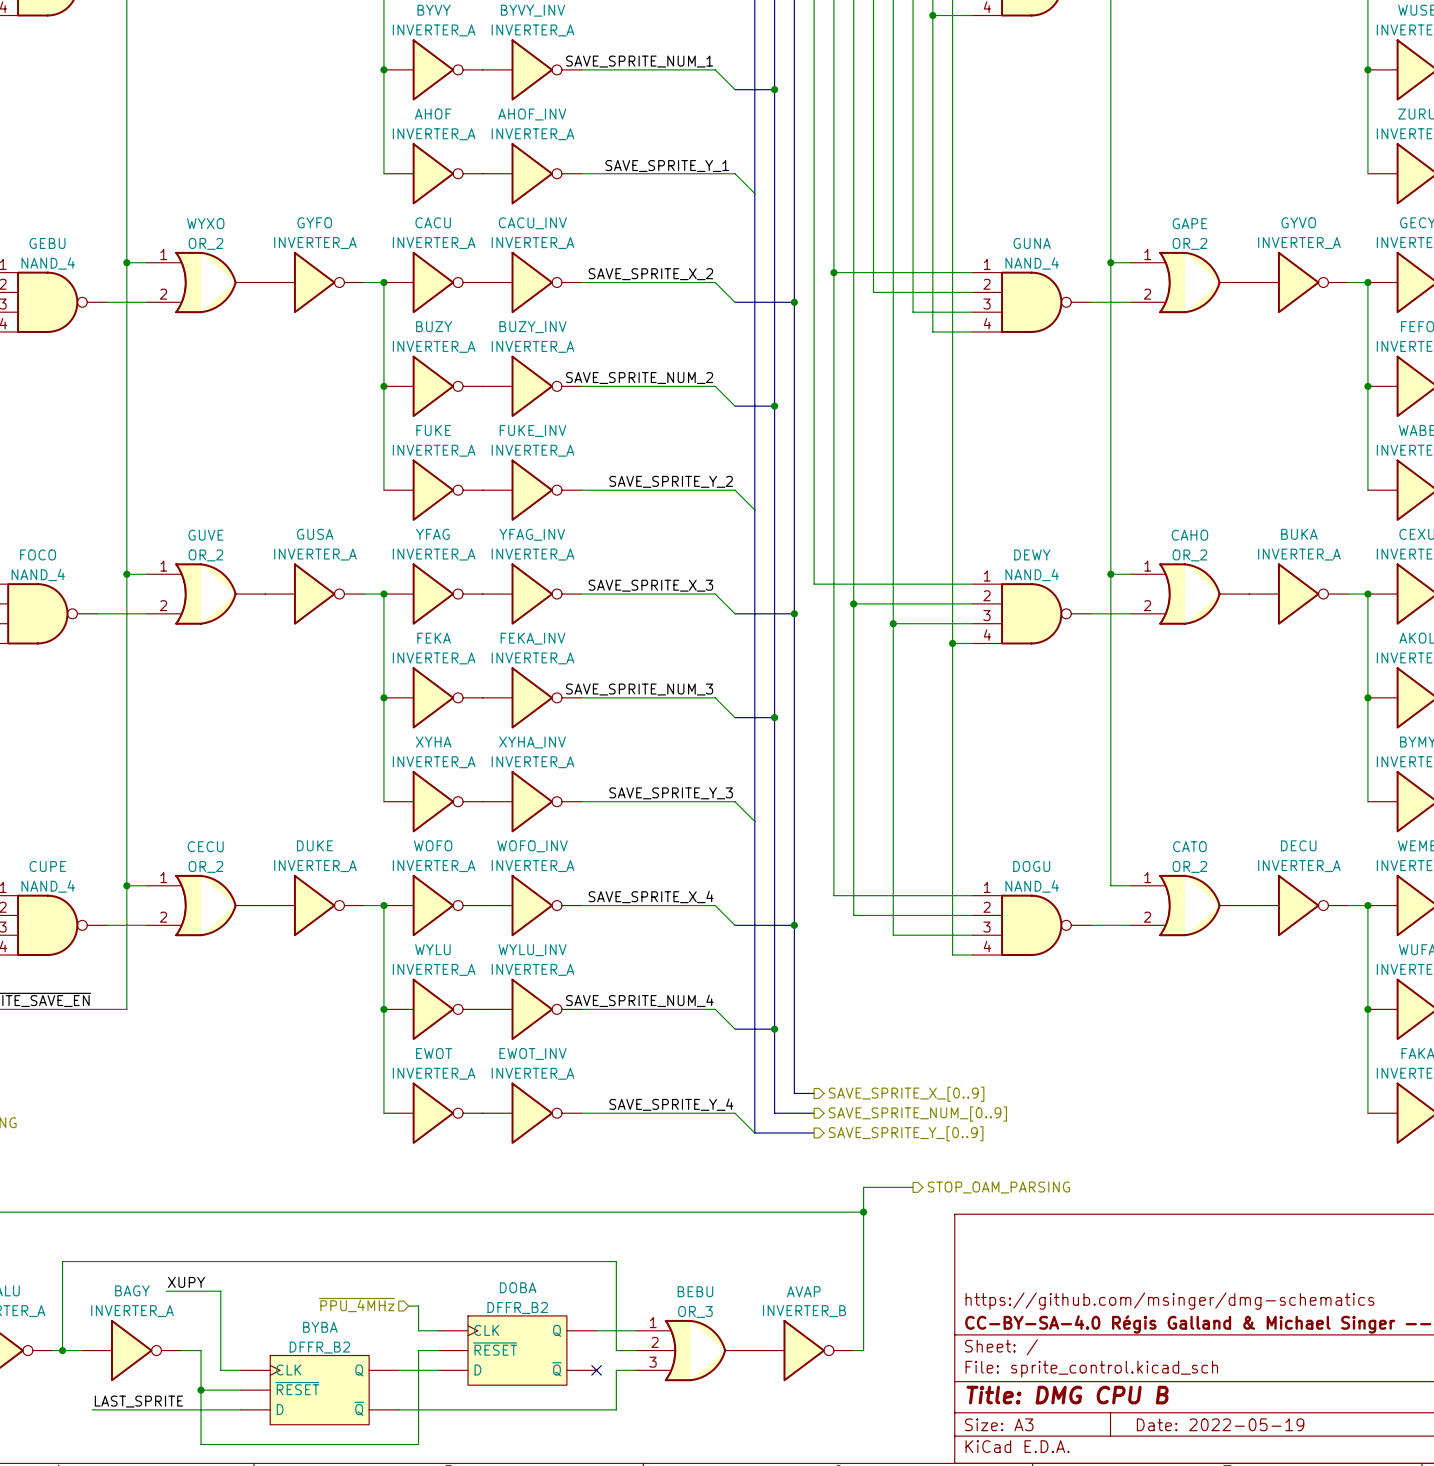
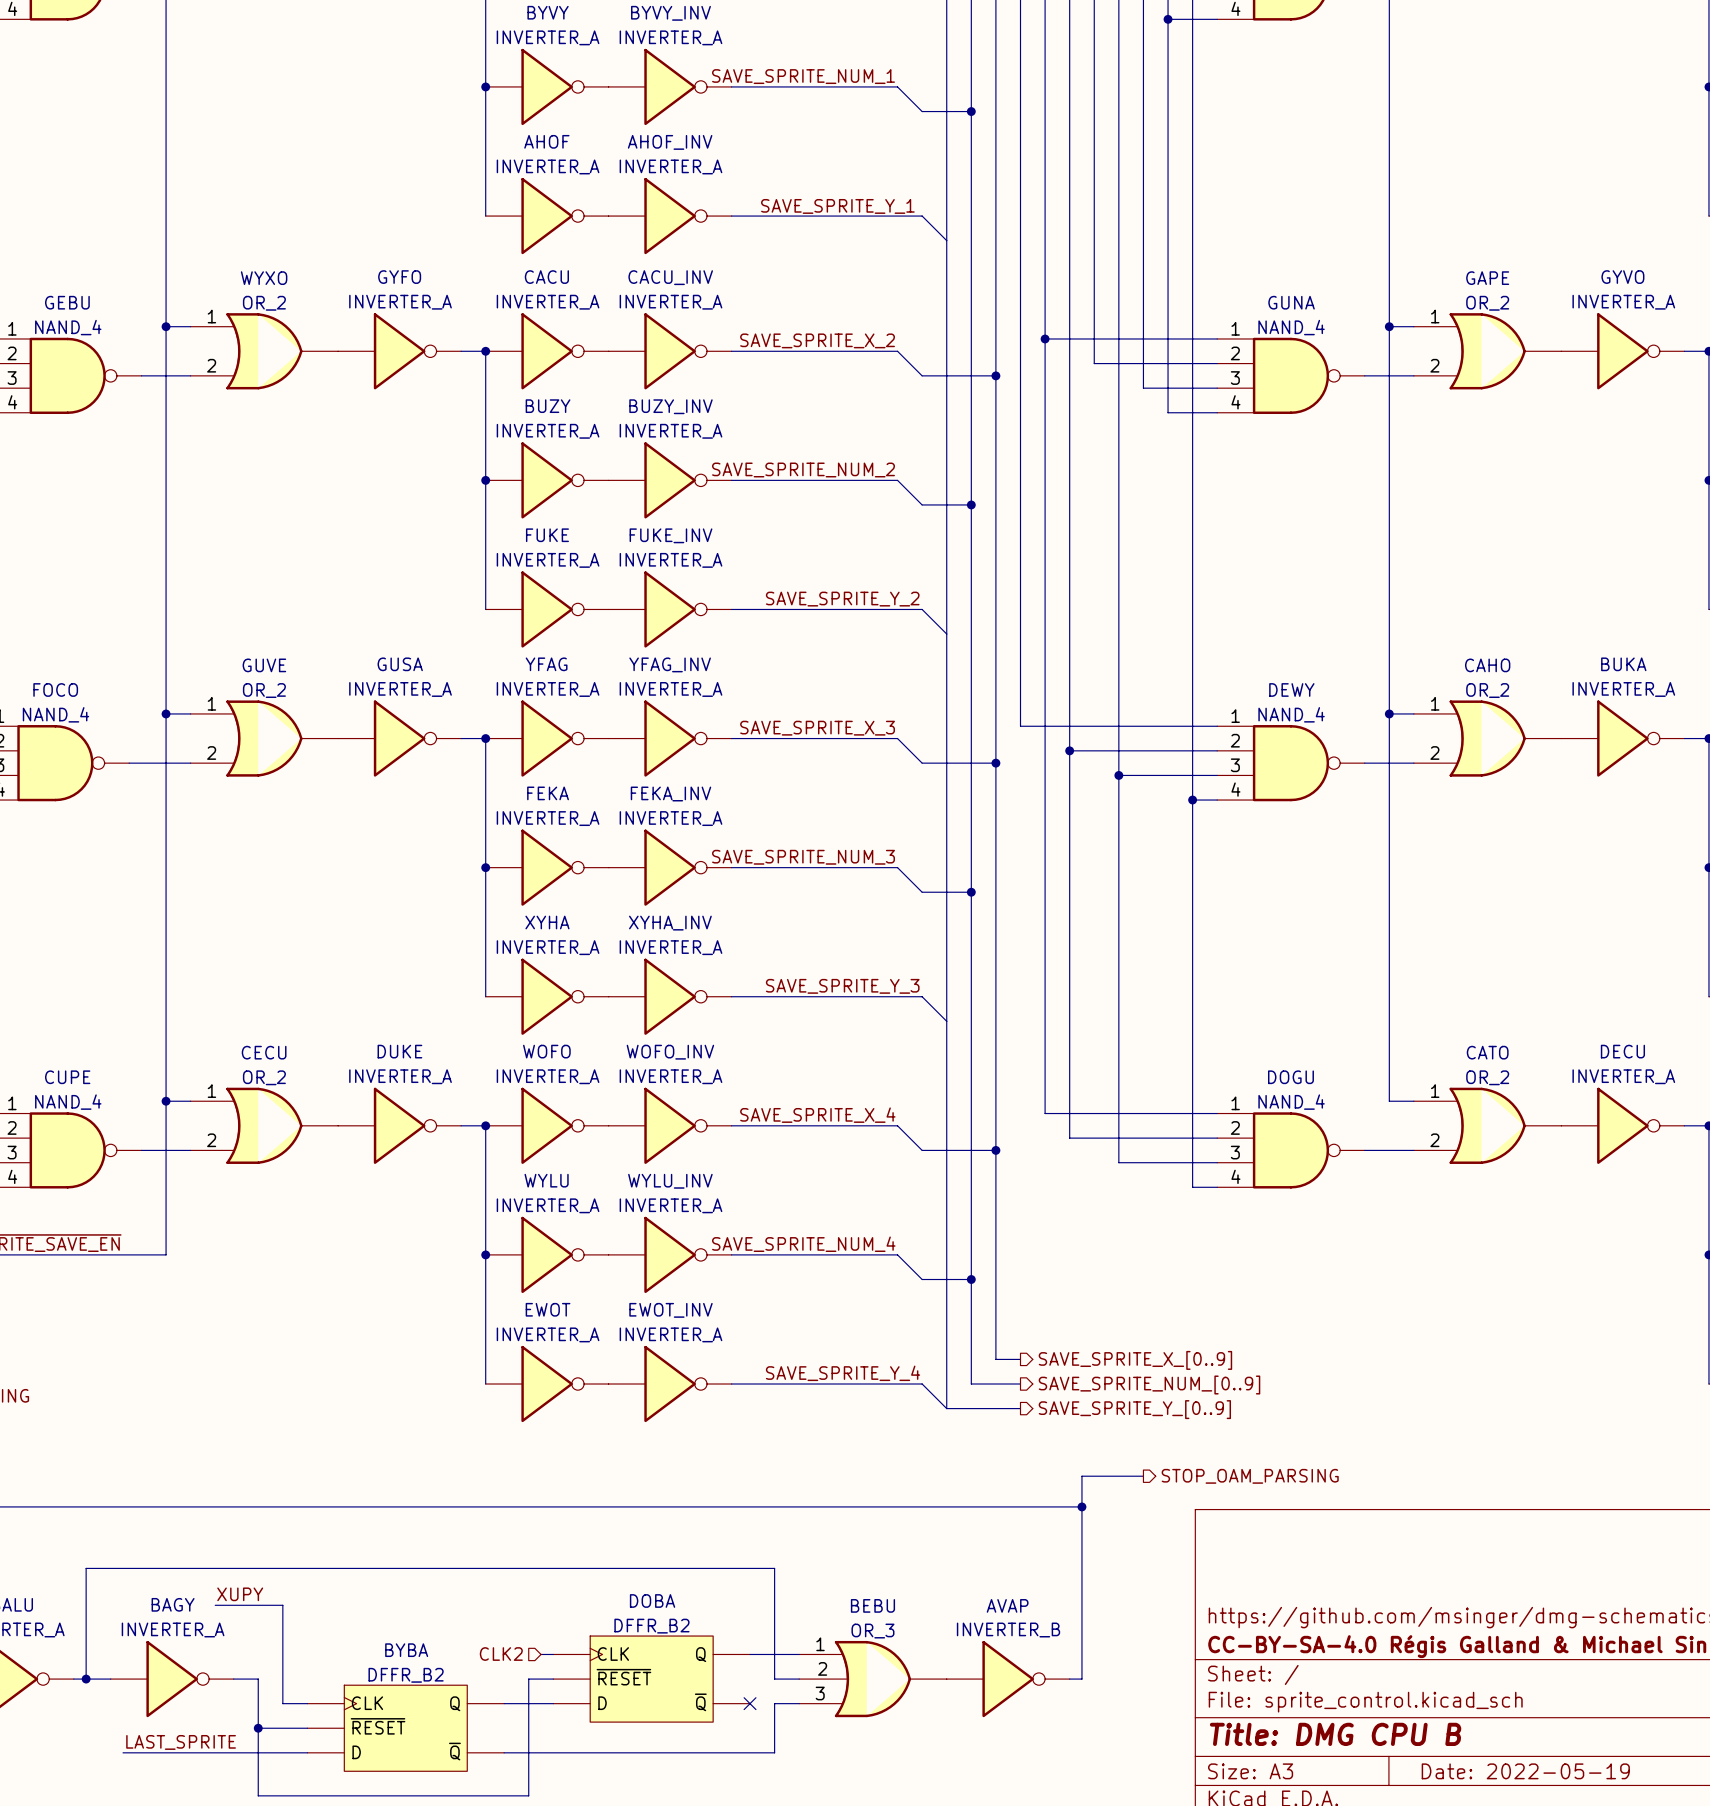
hierarchical label: ~{PPU_4MHz} (356, 1305) -> none
wire: (408, 1306) (418, 1306) (418, 1330) (428, 1330) -> none
hierarchical label: none -> CLK2 (501, 1654)

